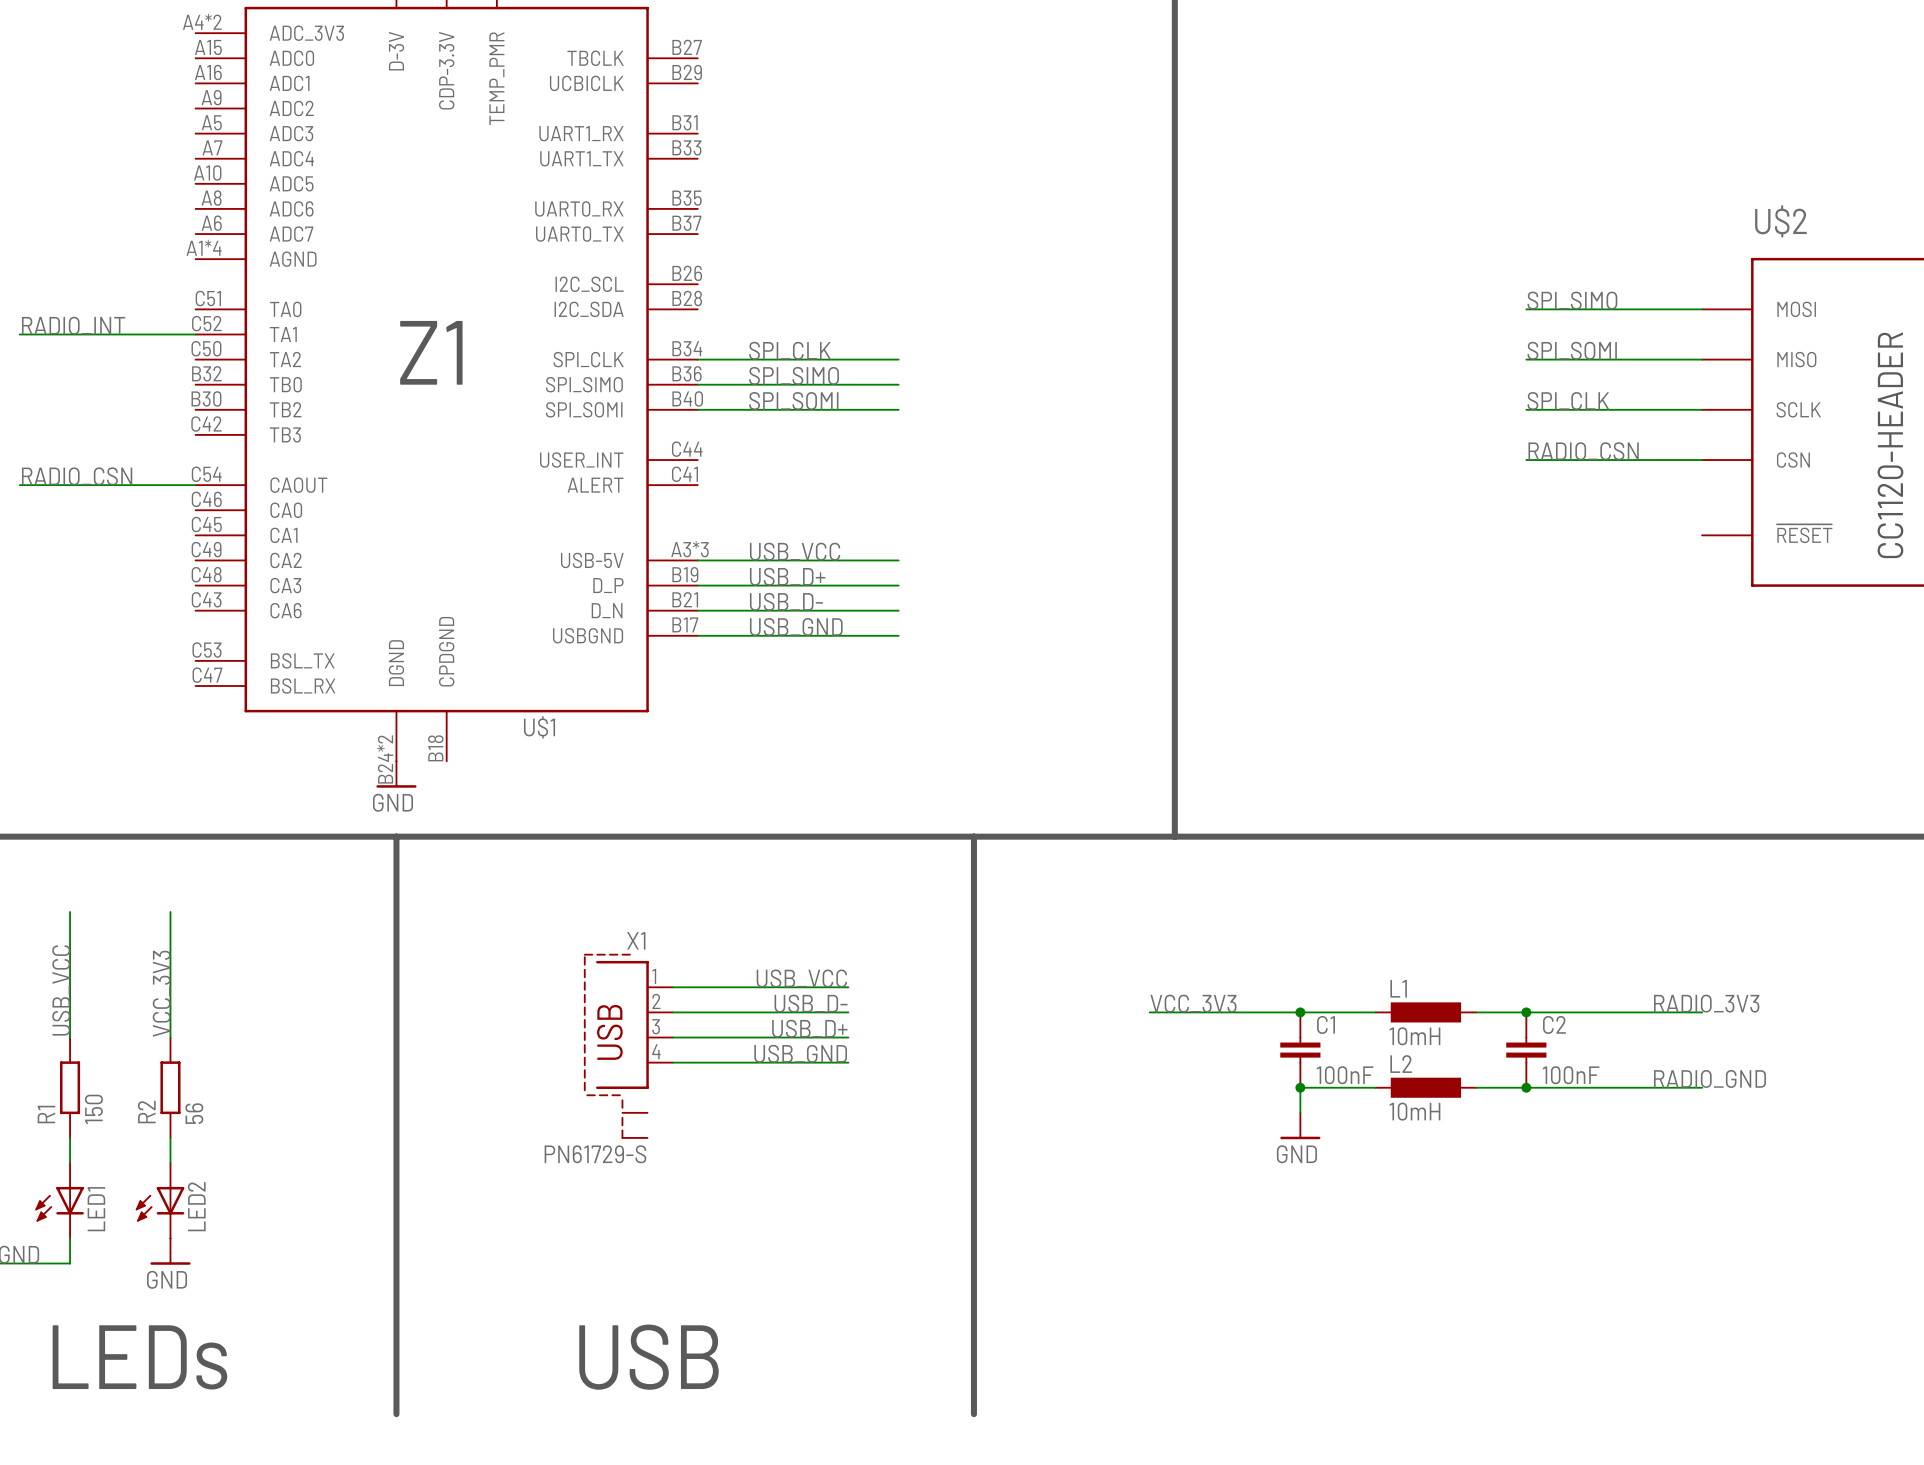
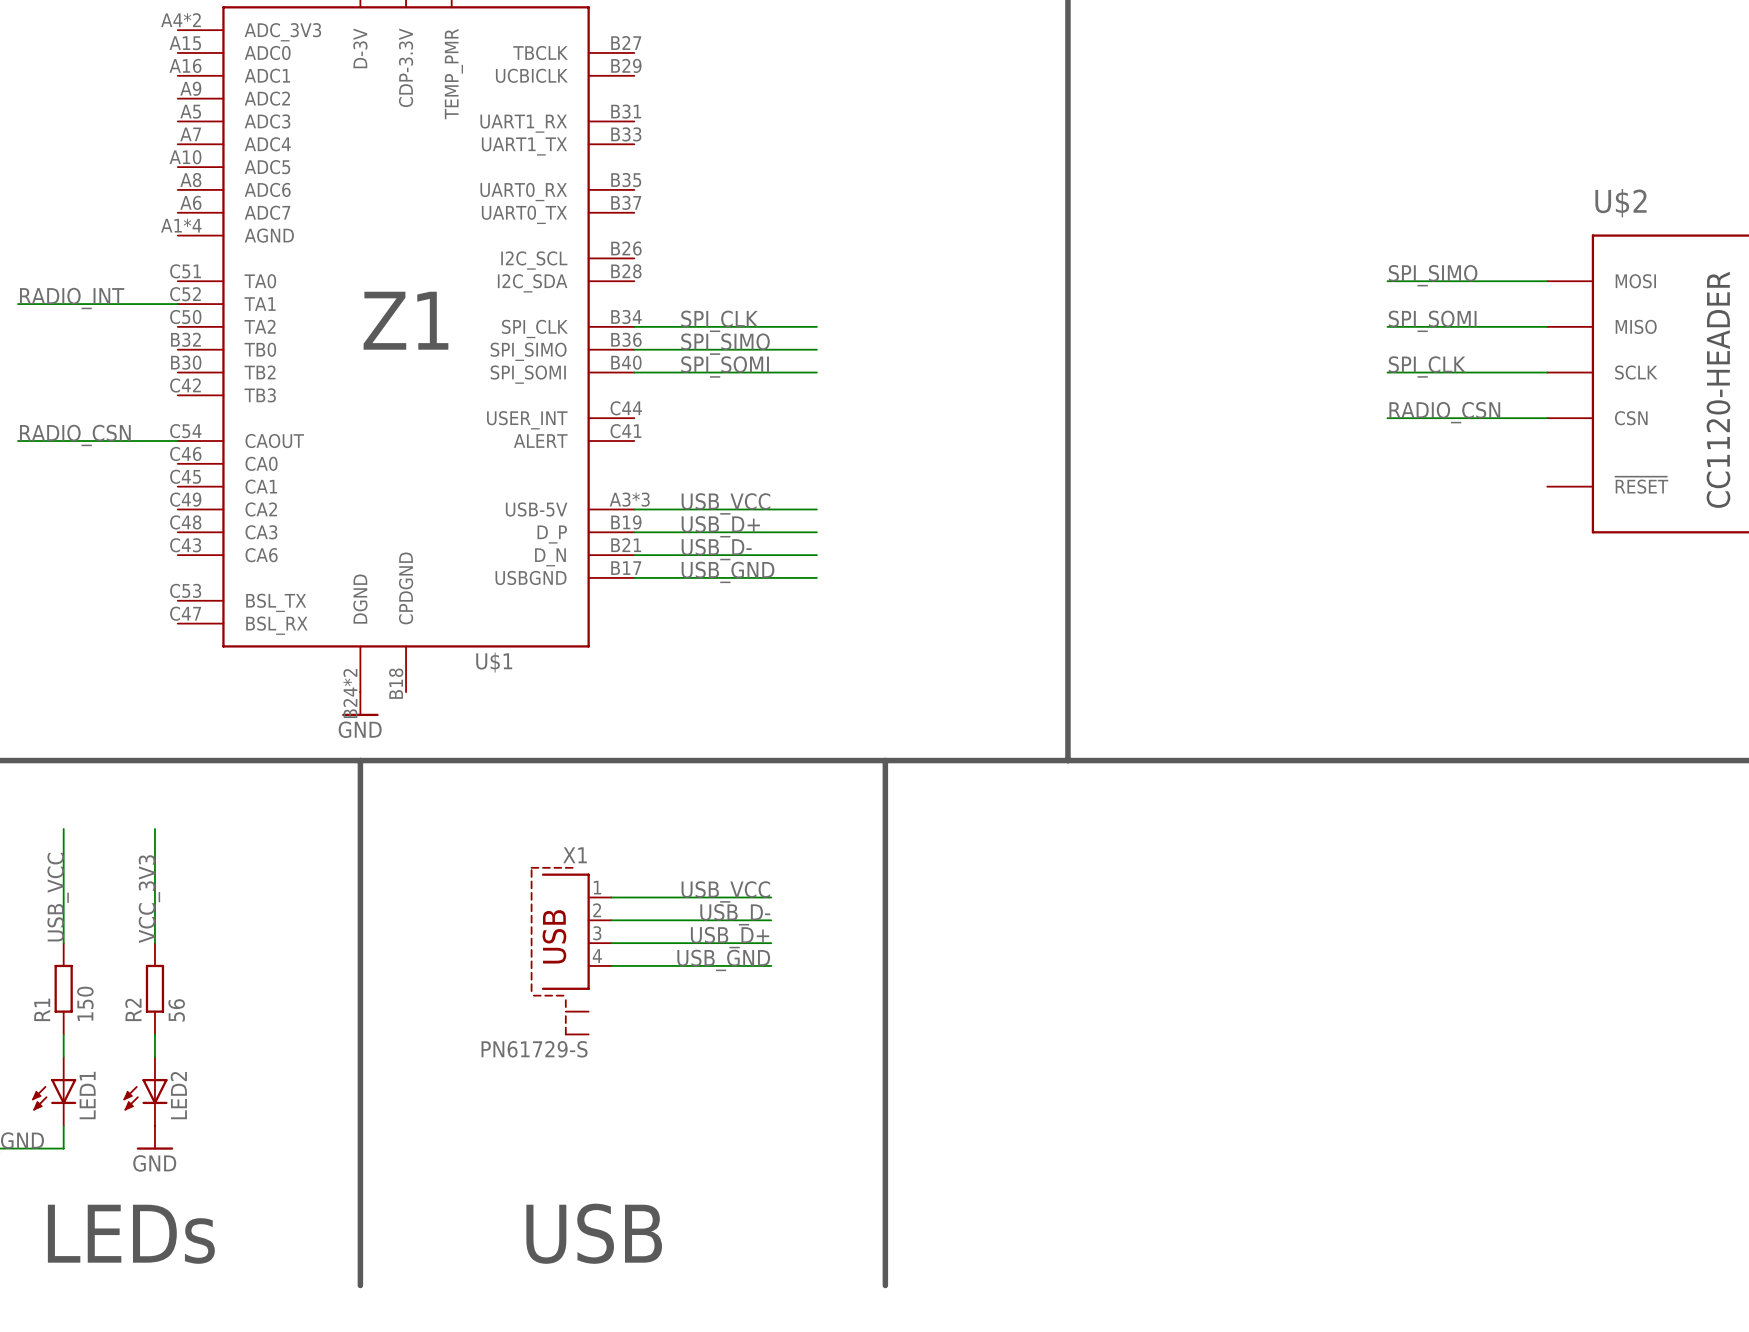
label: VCC_3V3 (1193, 1003) -> none
label: RADIO_3V3 (1706, 1003) -> none
wire: (1149, 1012) (1375, 1012) -> none
junction: (1300, 1012) -> none
L1: 10mH (1425, 1012) -> none
wire: (1476, 1012) (1702, 1012) -> none
junction: (1526, 1012) -> none
C1: 100nF (1300, 1050) -> none
C2: 100nF (1526, 1050) -> none
label: RADIO_GND (1709, 1078) -> none
junction: (1300, 1087) -> none
wire: (1375, 1087) (1300, 1087) (1300, 1112) -> none
L2: 10mH (1425, 1087) -> none
wire: (1476, 1087) (1702, 1087) -> none
junction: (1526, 1087) -> none
power symbol: GND (1300, 1126) -> none

